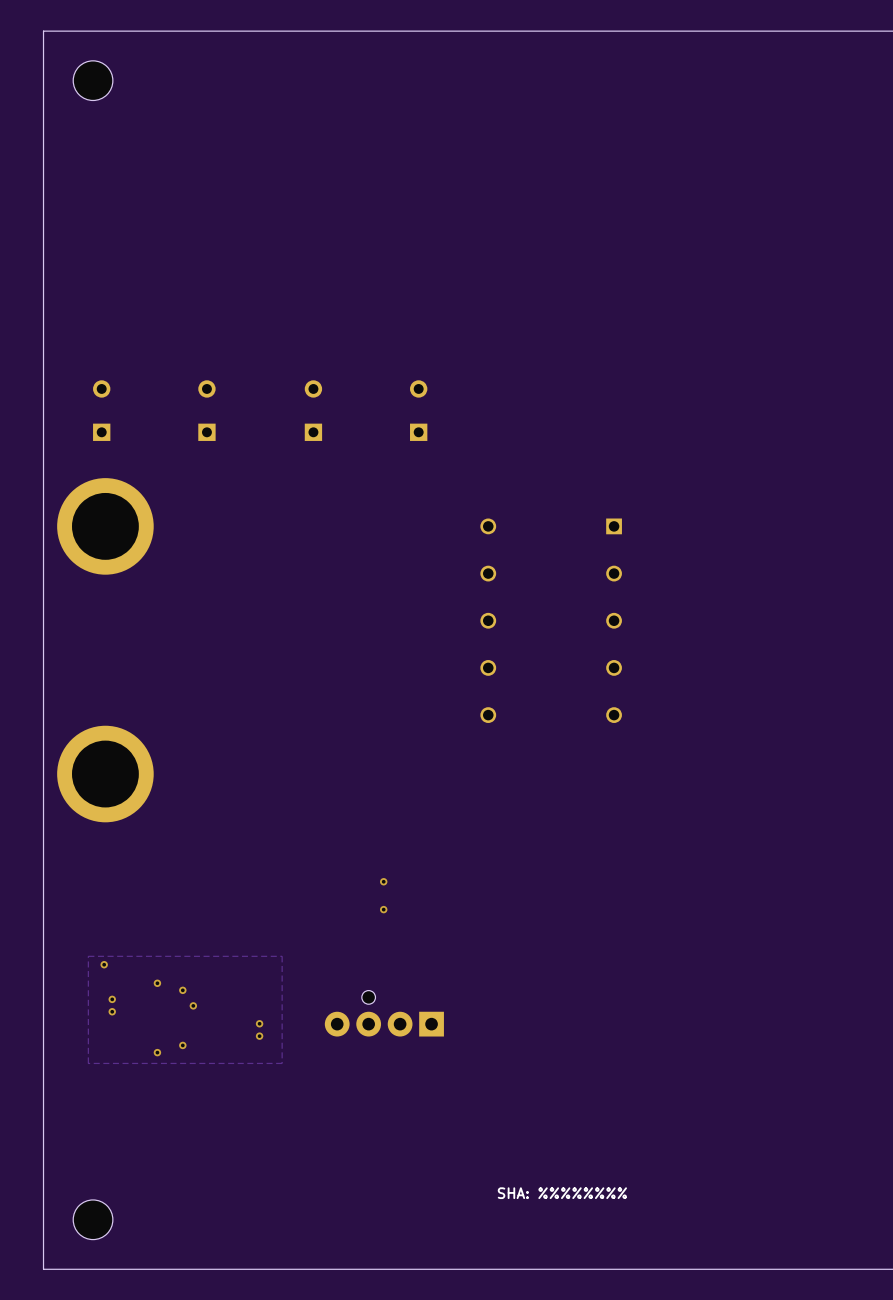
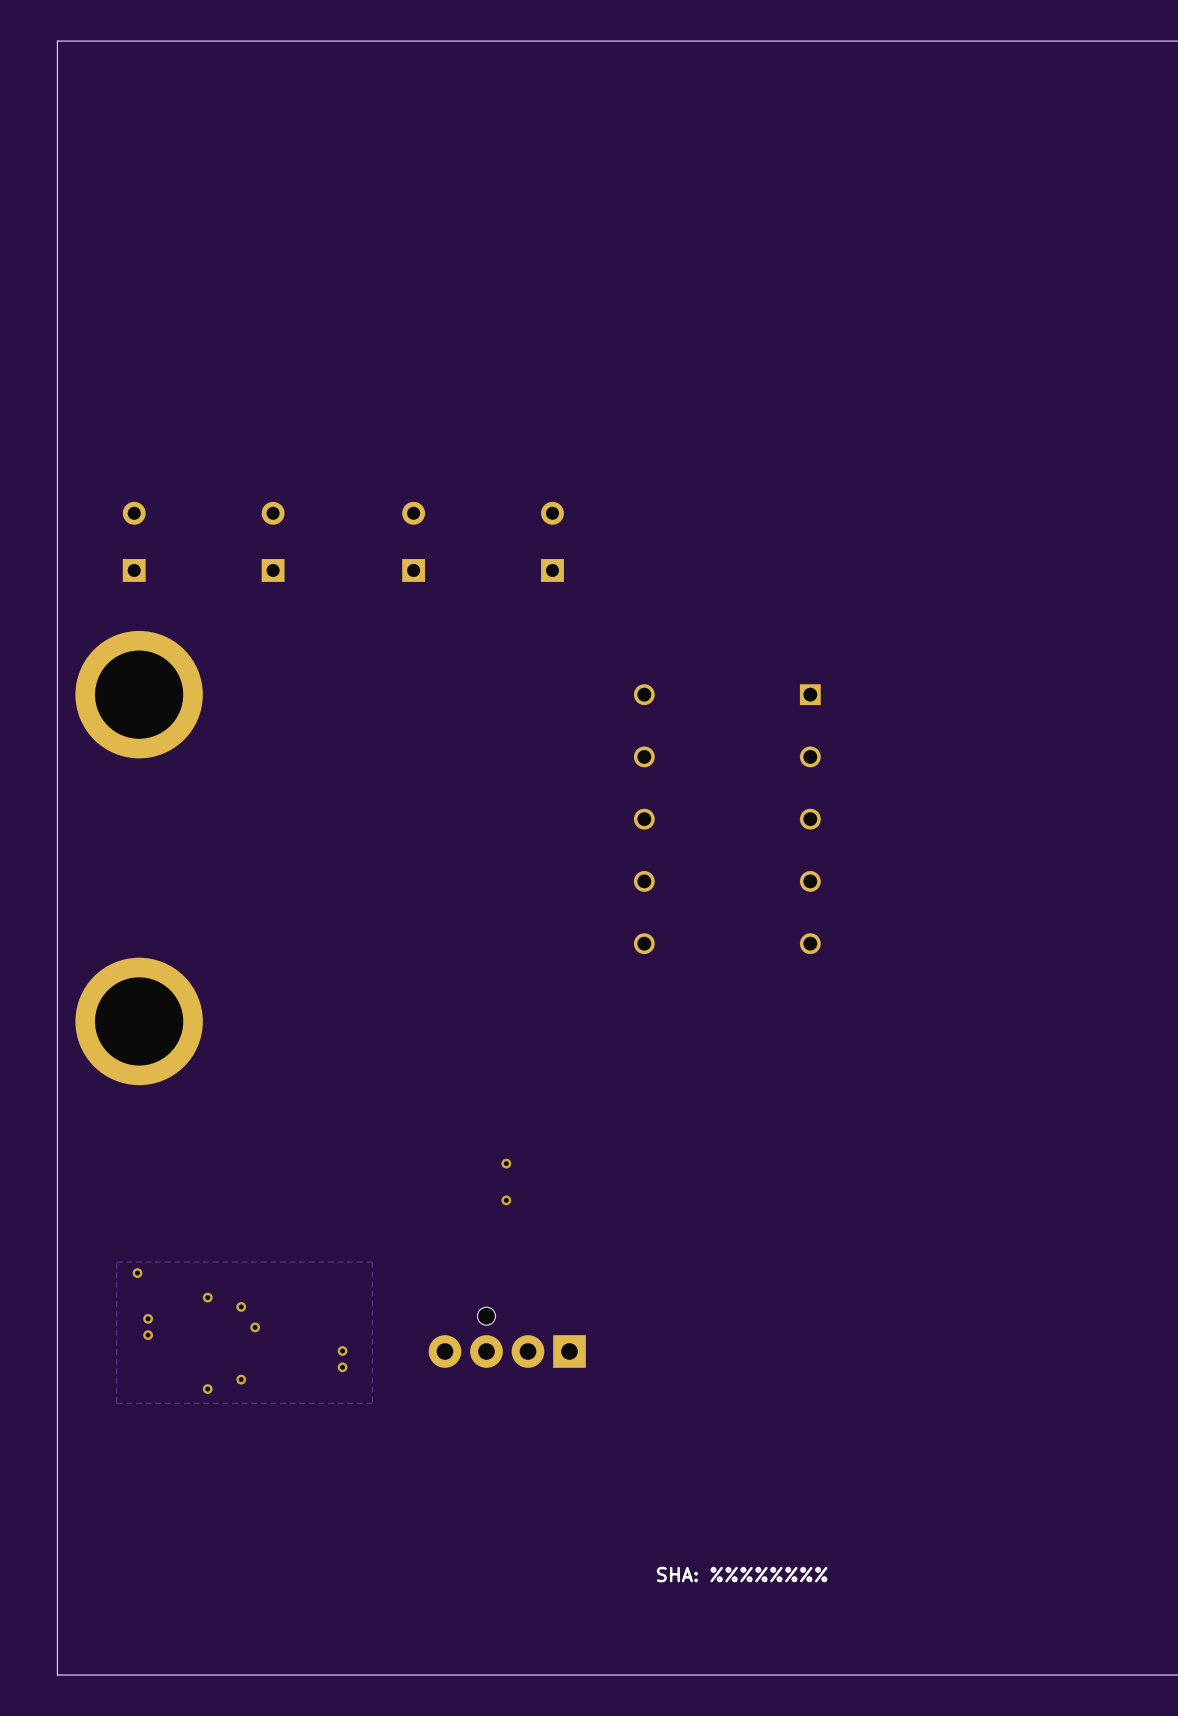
part: (93, 80) -> none
part: (93, 1219) -> none

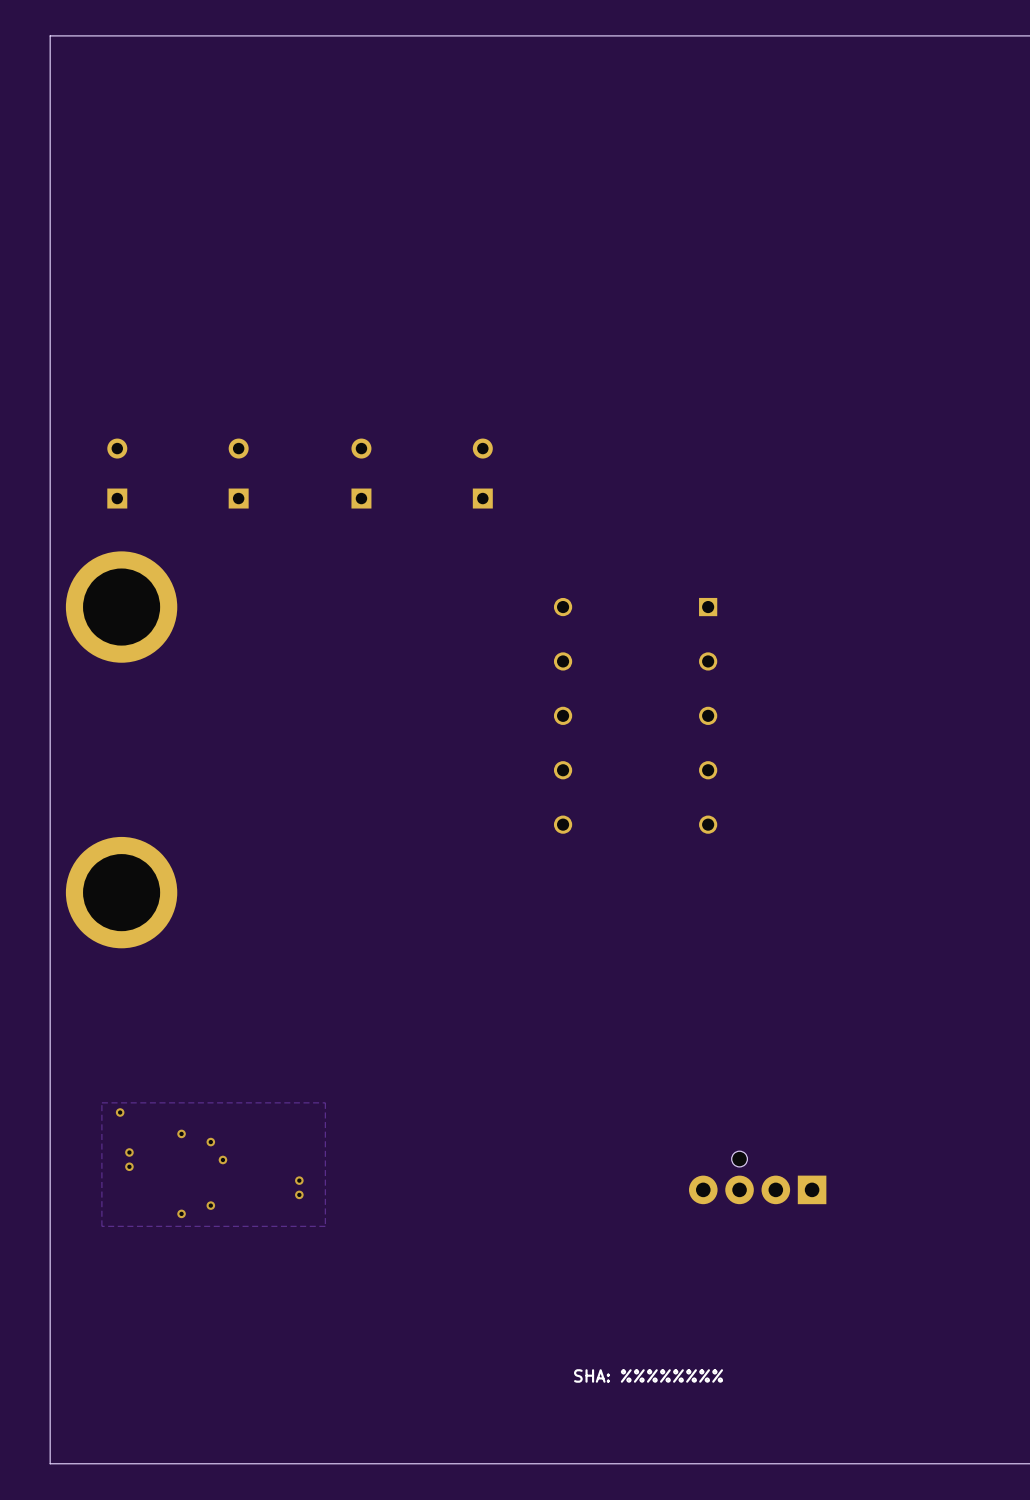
via: (506, 1163) -> none
via: (506, 1200) -> none
part position: (507, 1337) -> (757, 1177)

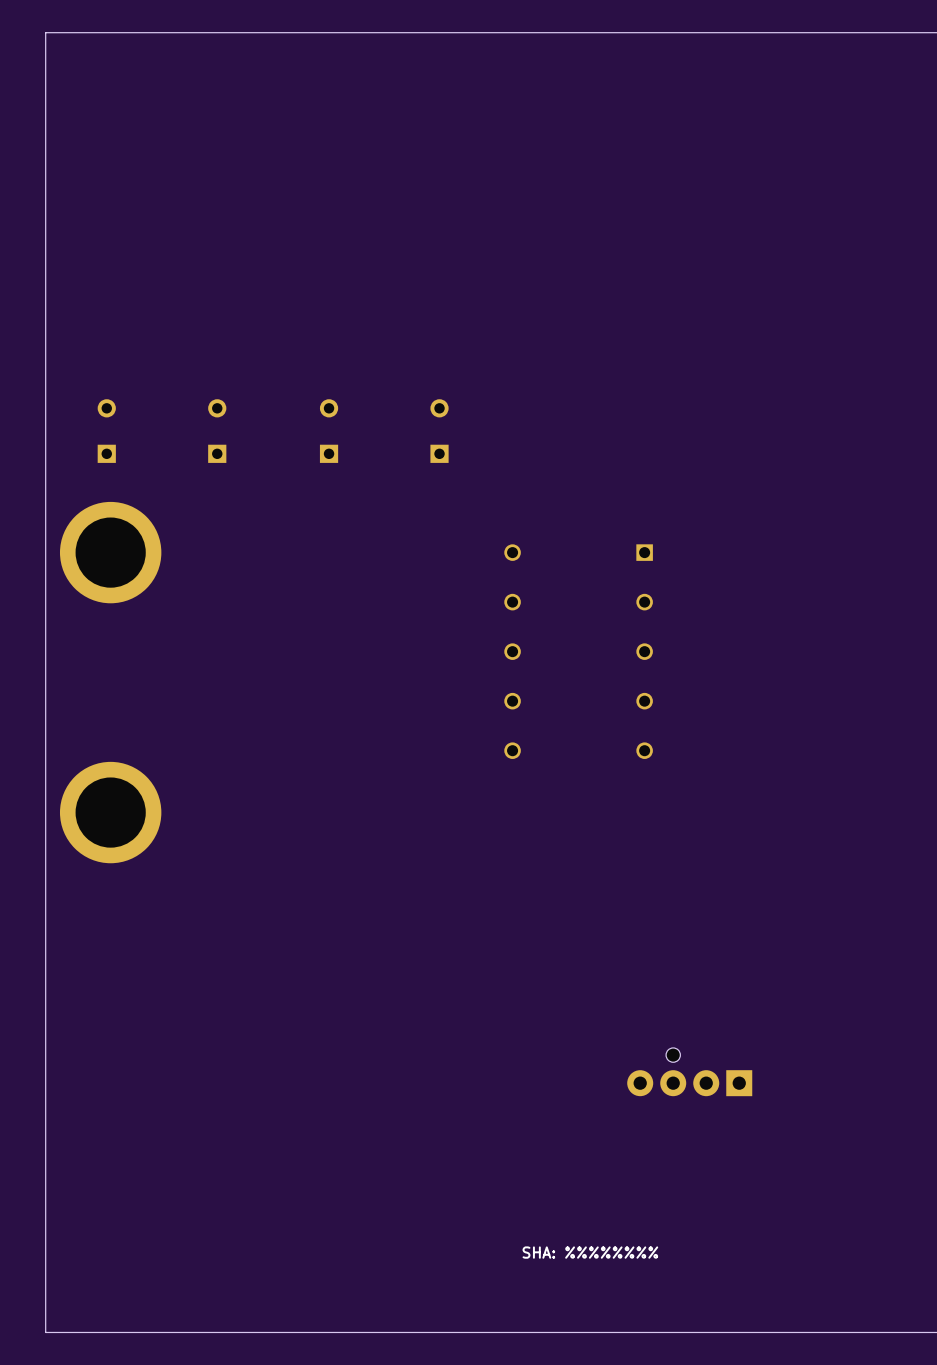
zone outline: (325, 1102) (101, 1102) (101, 1226) (325, 1226) (325, 1102) -> none
via: (120, 1112) -> none
via: (181, 1133) -> none
via: (210, 1142) -> none
via: (129, 1152) -> none
via: (222, 1159) -> none
via: (129, 1166) -> none
via: (299, 1180) -> none
via: (299, 1194) -> none
via: (210, 1205) -> none
via: (181, 1213) -> none

